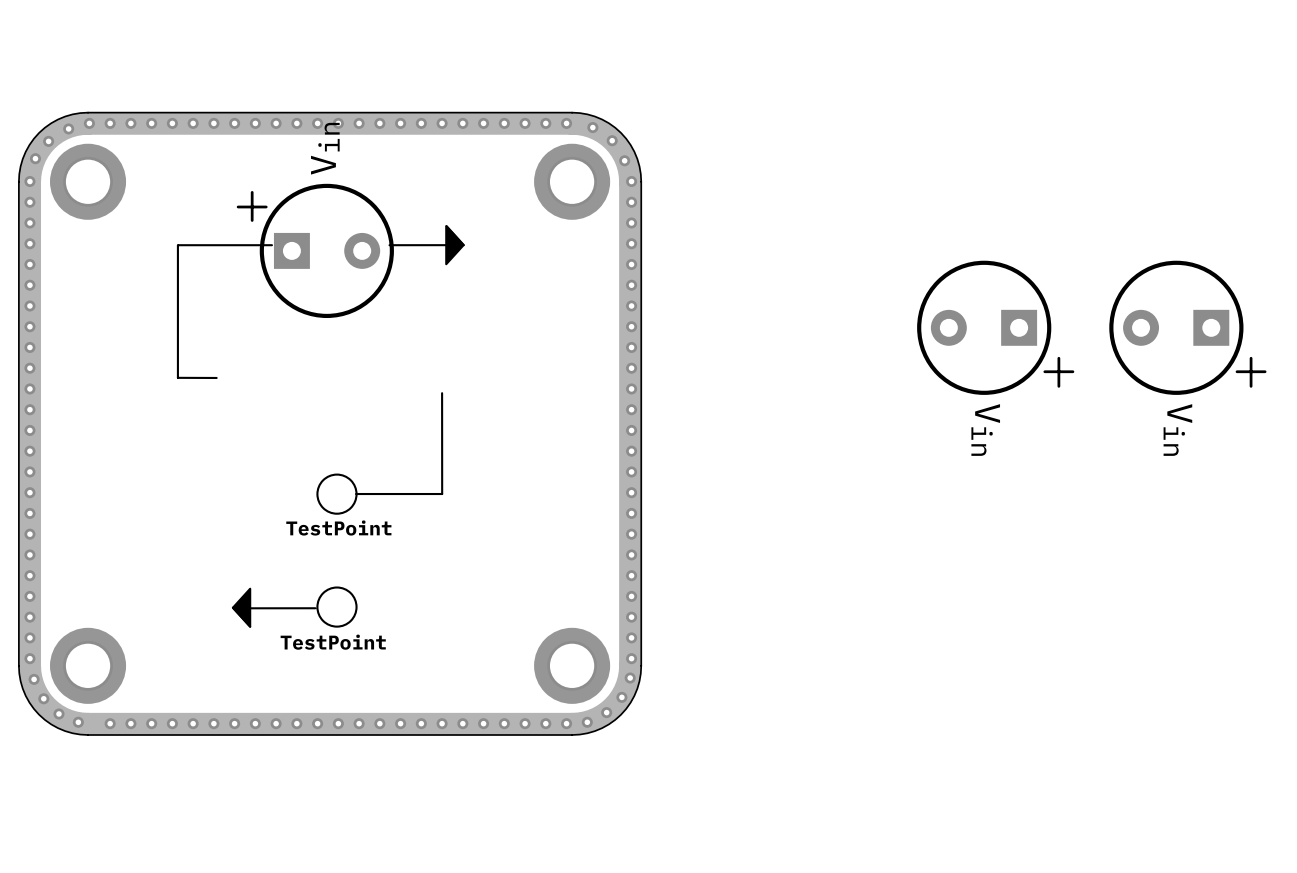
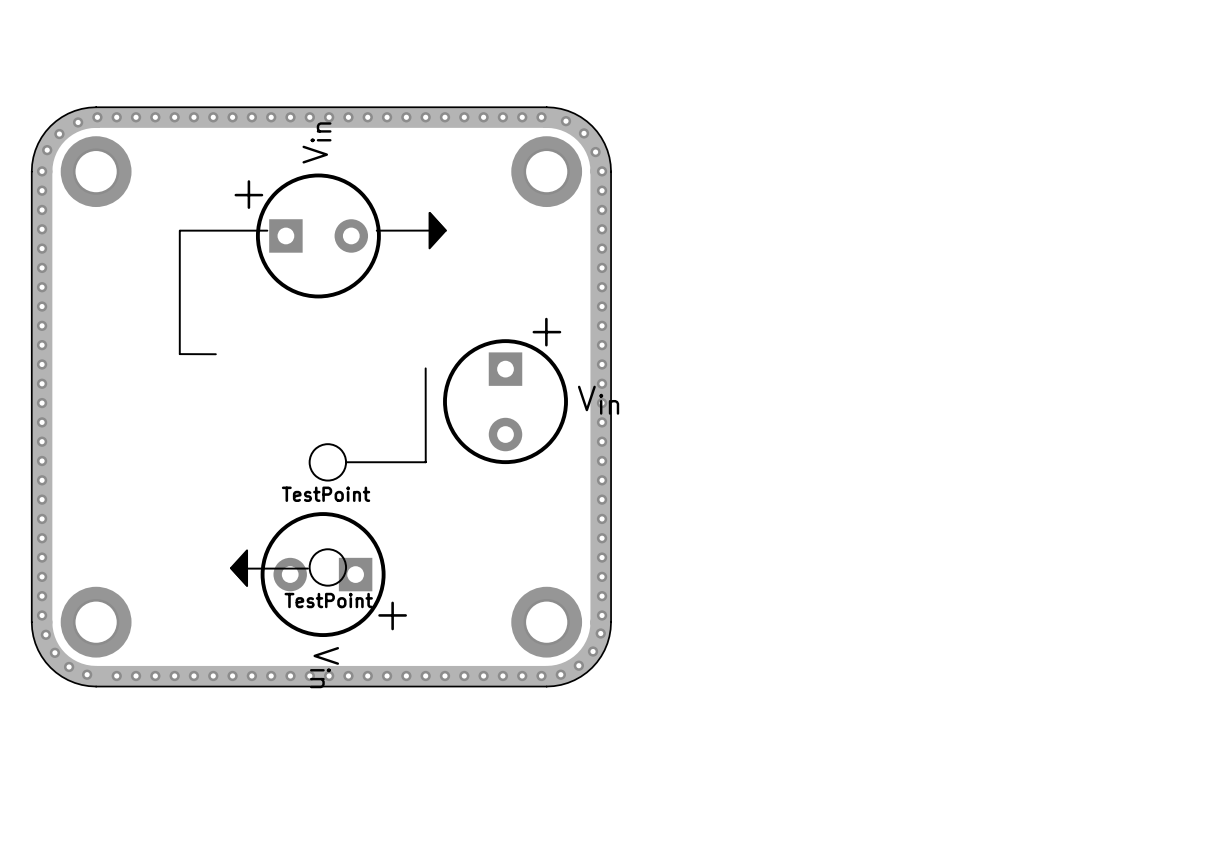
part: (995, 327) -> none
part: (1187, 327) -> none
part: none -> (505, 390)
part: none -> (333, 574)

